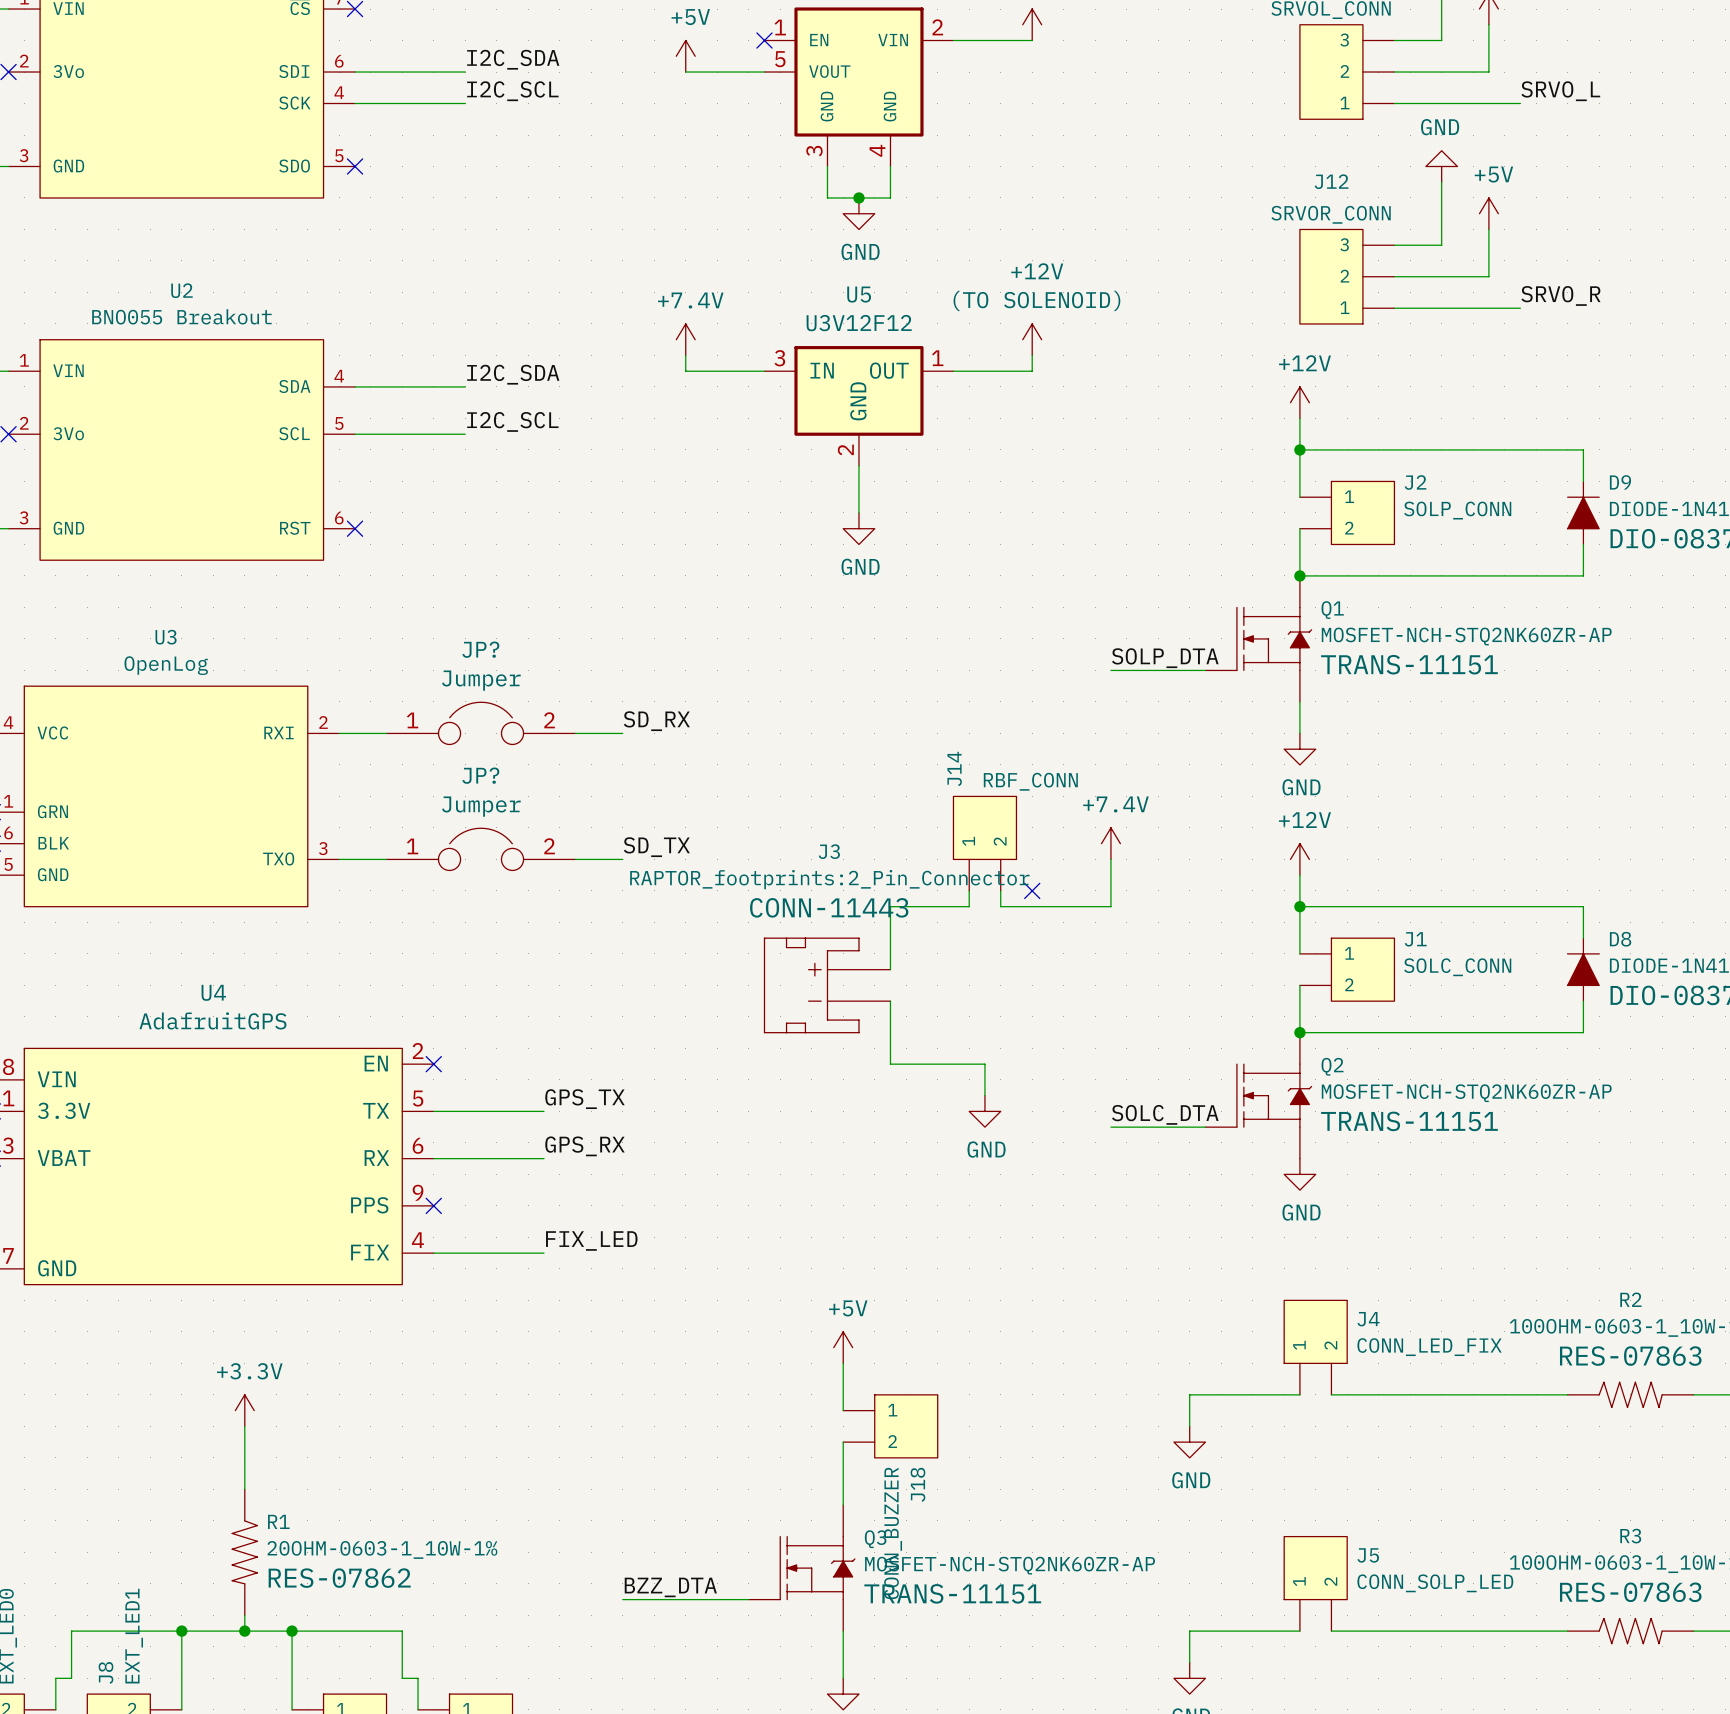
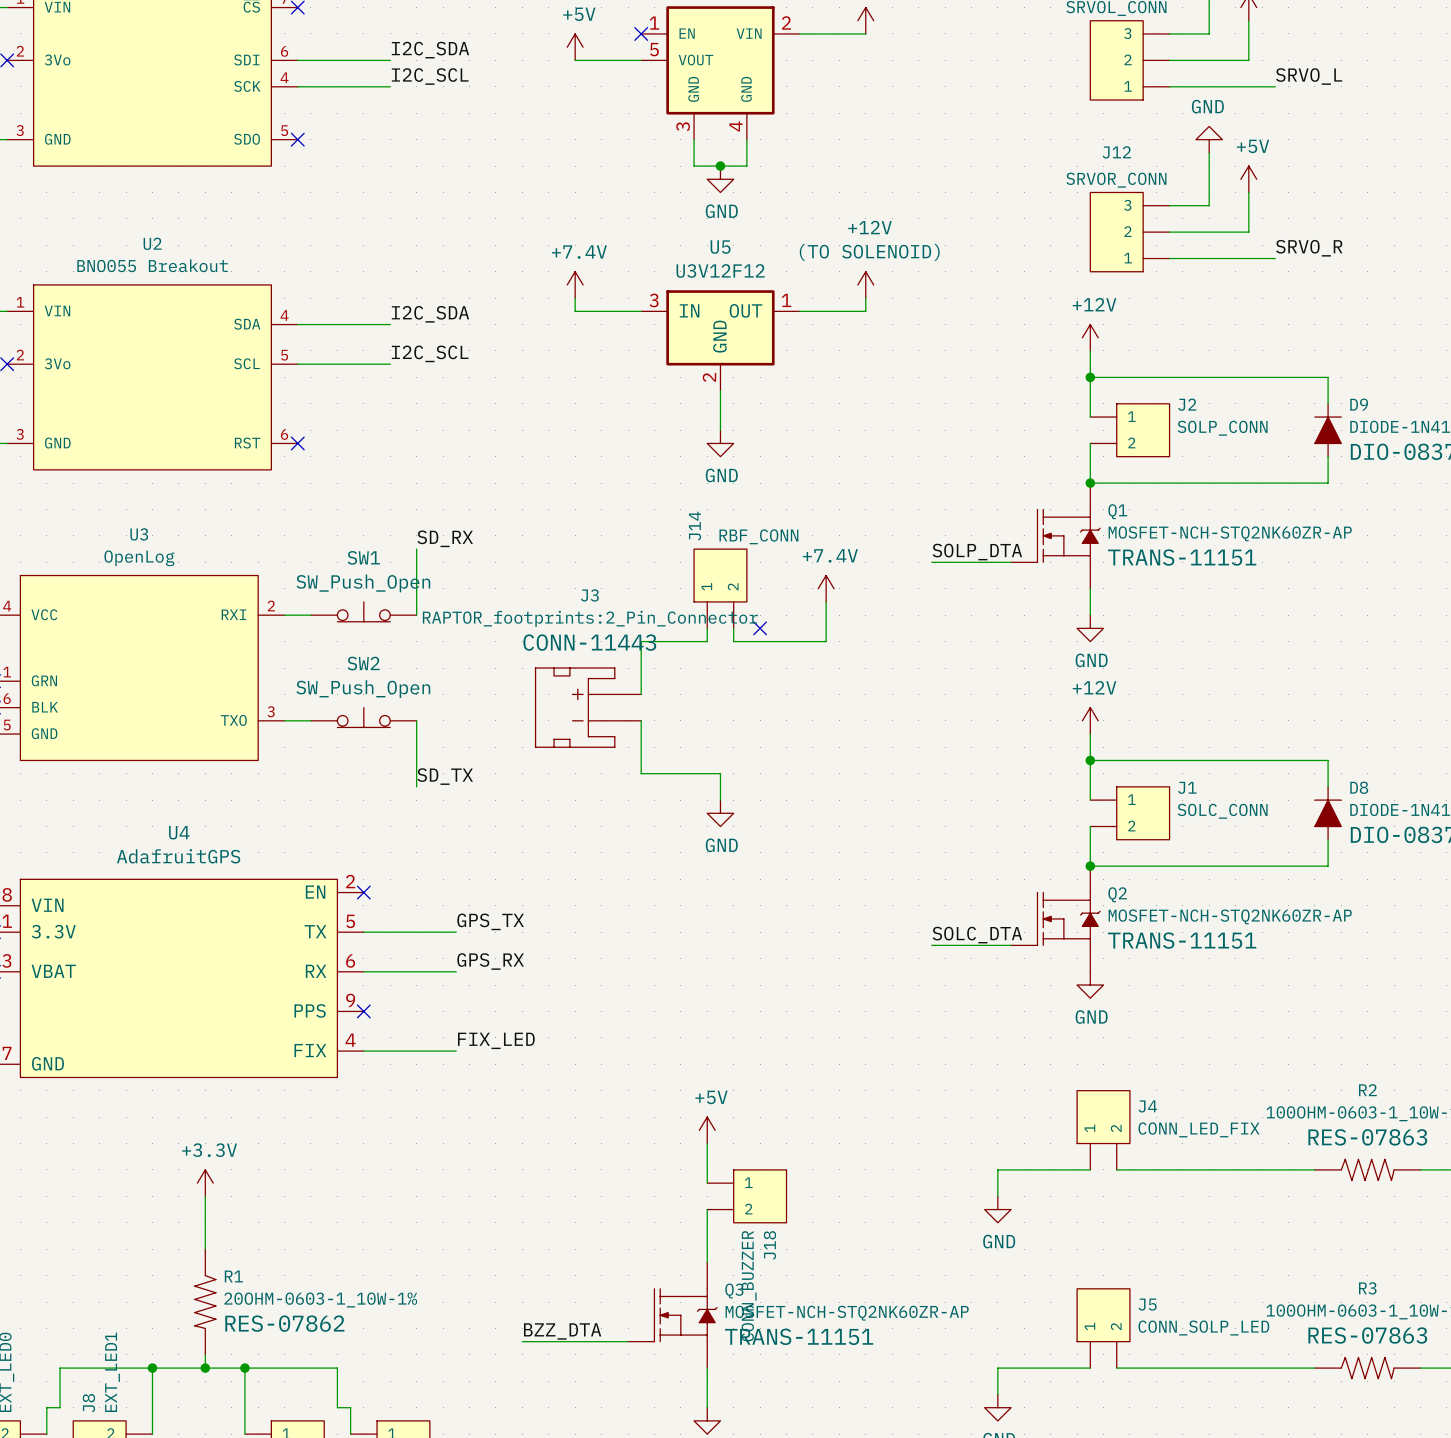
wire: none -> (416, 549) (416, 615)
label position: SD_RX (656, 721) -> SD_RX (445, 538)
JP?: Jumper (481, 723) -> none
SW1: none -> SW_Push_Open (363, 611)
wire: (575, 733) (622, 733) -> none
no-connect mark: none -> (760, 628)
J14 position: (984, 843) -> (720, 588)
power symbol position: (1110, 843) -> (826, 588)
label position: SD_TX (656, 847) -> SD_TX (445, 776)
JP?: Jumper (481, 849) -> none
SW2: none -> SW_Push_Open (363, 717)
wire: none -> (416, 720) (416, 786)
wire: (575, 859) (622, 859) -> none
wire: (1110, 859) (1110, 906) (1000, 906) (1000, 890) -> (826, 601) (826, 641) (733, 641) (733, 628)
wire: (969, 890) (969, 906) (890, 906) (890, 969) -> (707, 628) (707, 641) (641, 641) (641, 694)
no-connect mark: (1032, 890) -> none
J3 position: (827, 985) -> (588, 707)
wire: (890, 1001) (890, 1064) (984, 1064) (984, 1095) -> (641, 720) (641, 773) (720, 773) (720, 800)
power symbol position: GND (984, 1111) -> GND (720, 813)

